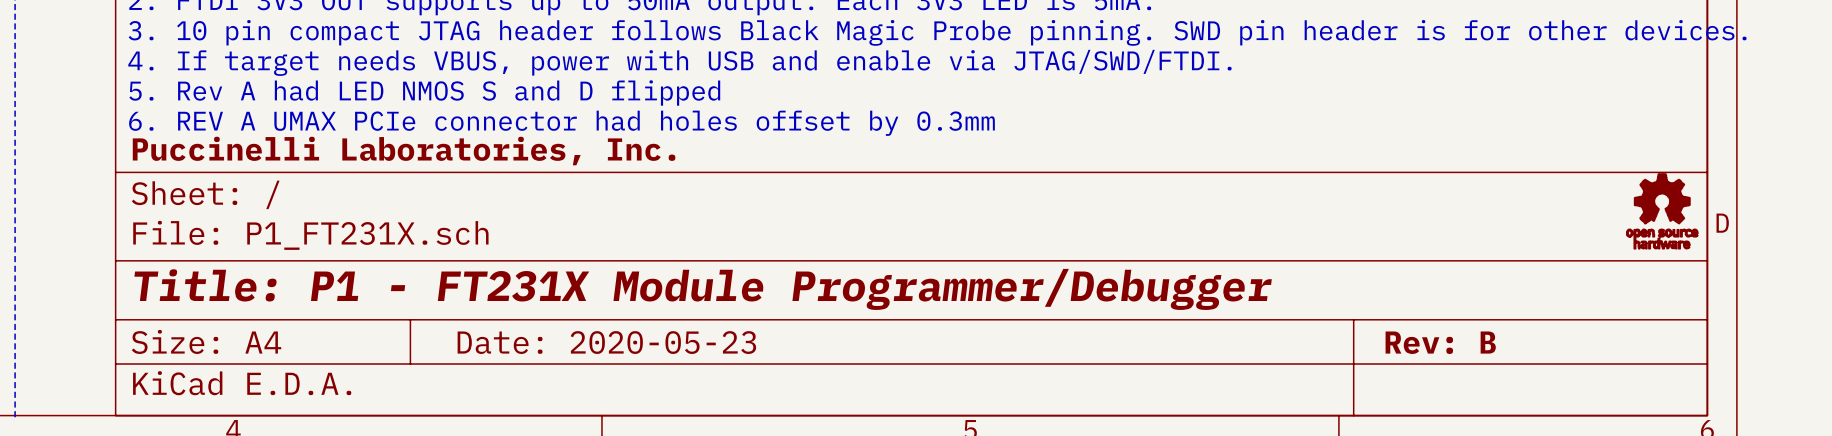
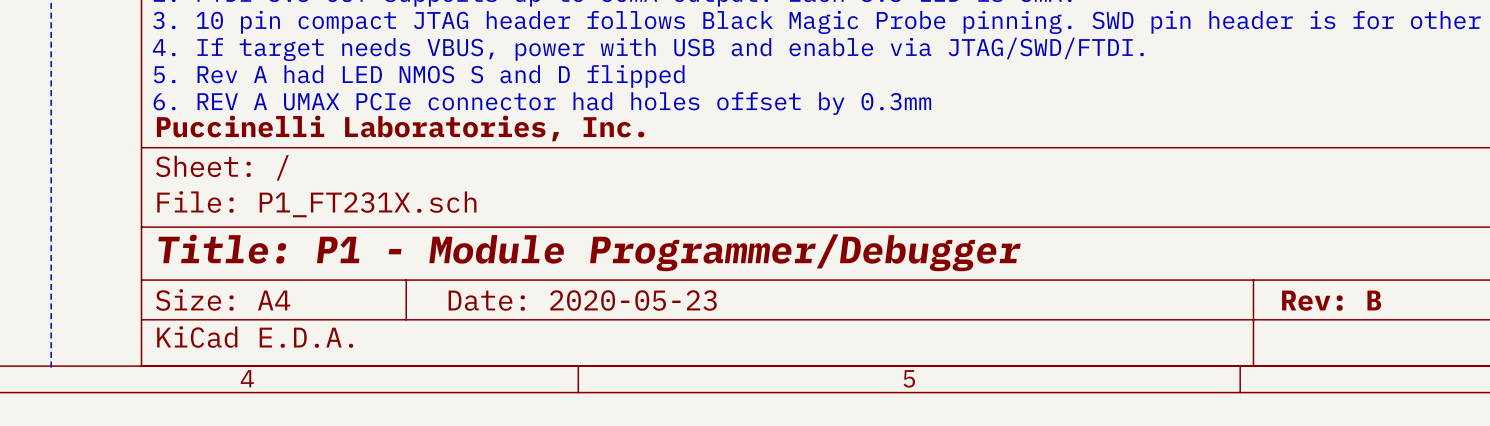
title block: Title: P1 - FT231X Module Programmer/Debugger (703, 289) -> Title: P1 - Module Programmer/Debugger (589, 252)

